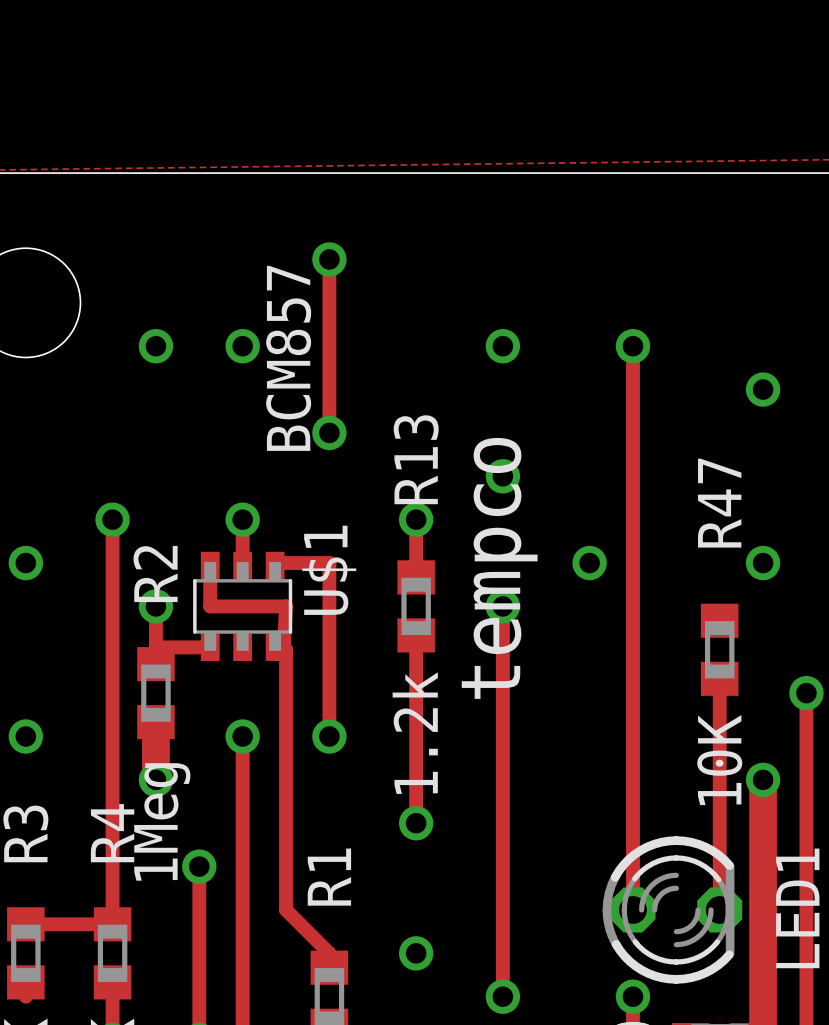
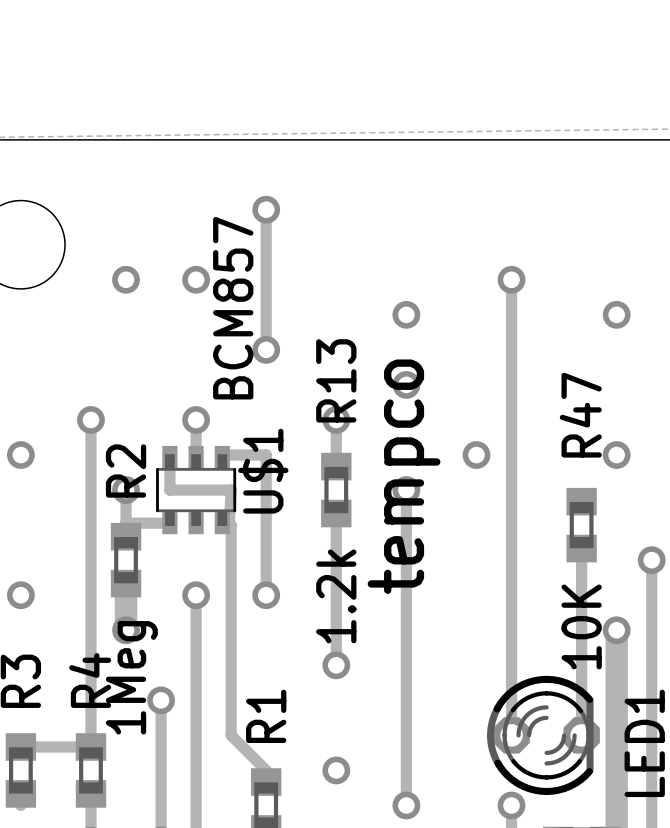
via position: (502, 346) -> (406, 314)

